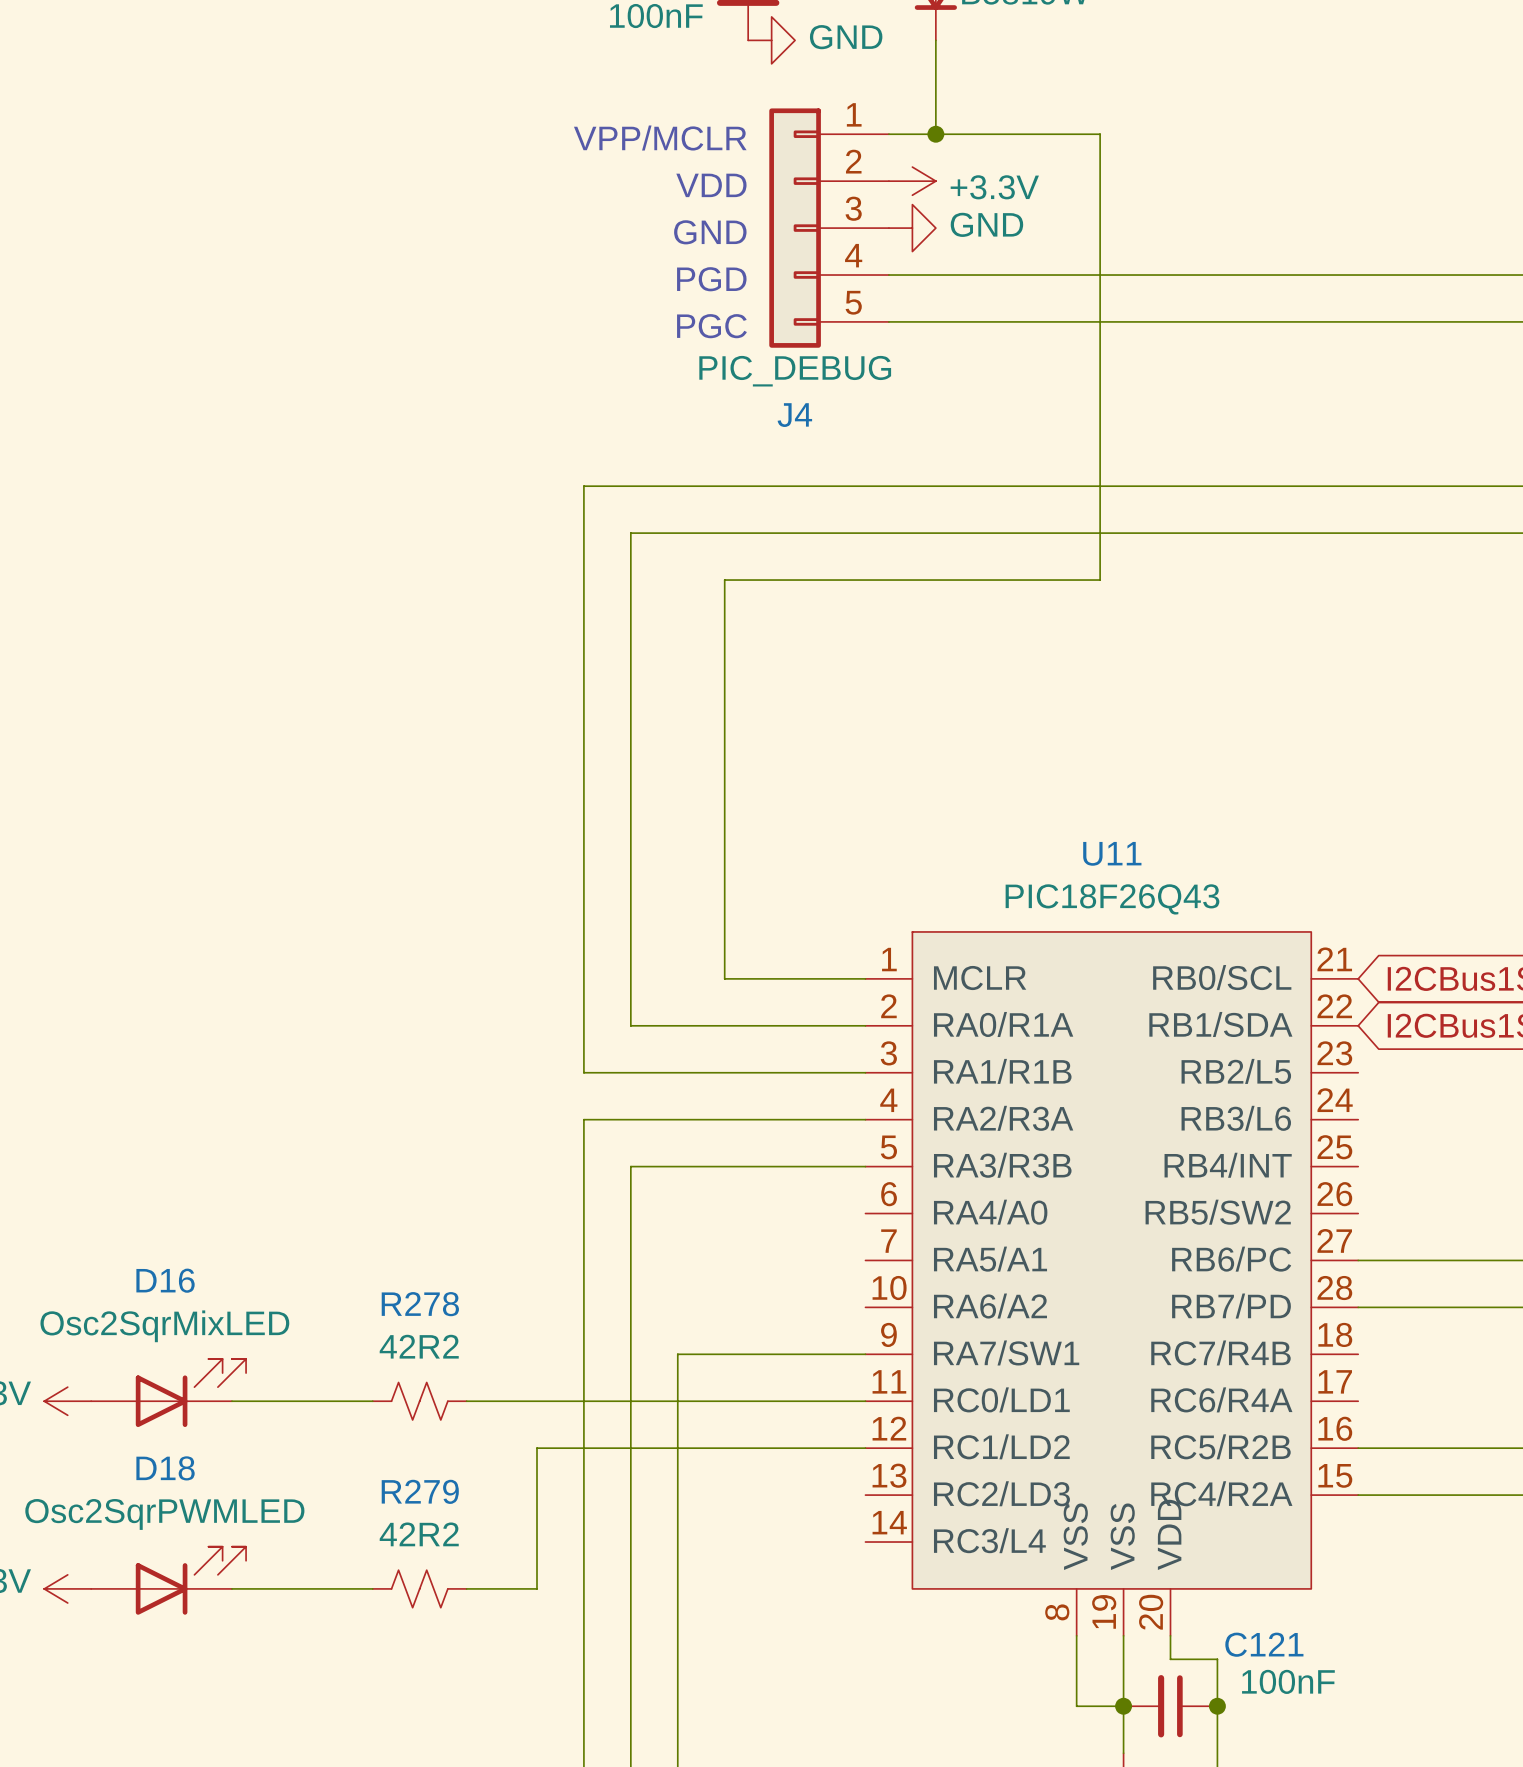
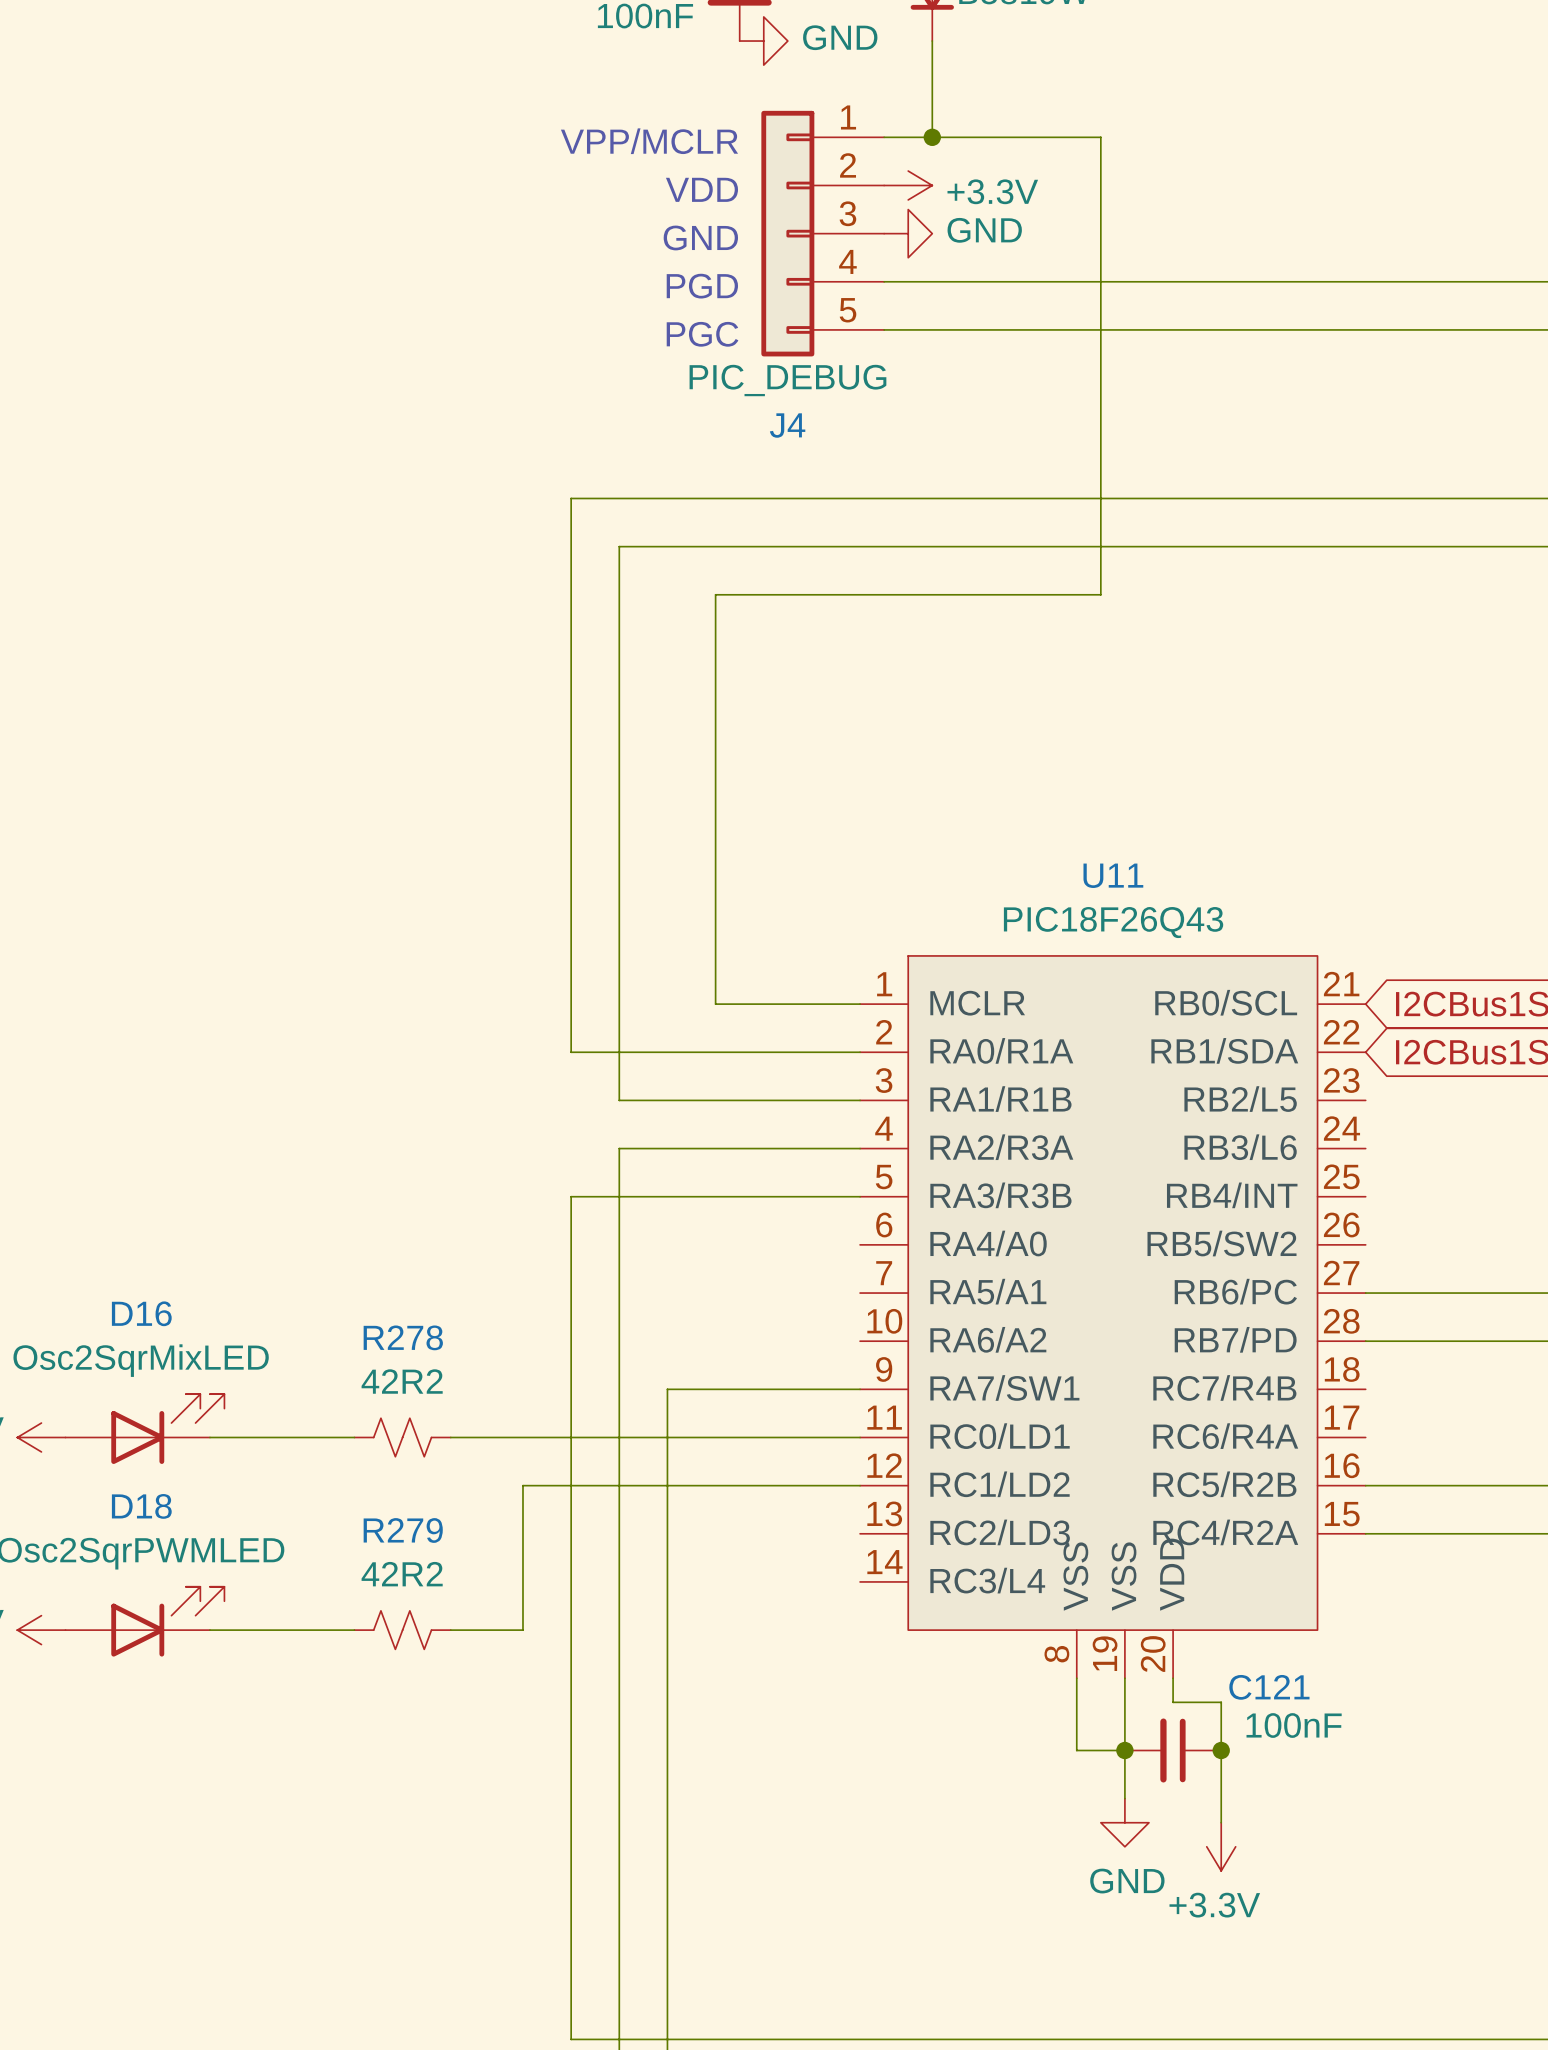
wire: (583, 1025) (583, 1072) (630, 1072) -> (571, 1052) (619, 1052) (619, 1100)
wire: (630, 1119) (583, 1119) (583, 1166) -> (619, 1148) (619, 1196) (571, 1196)

